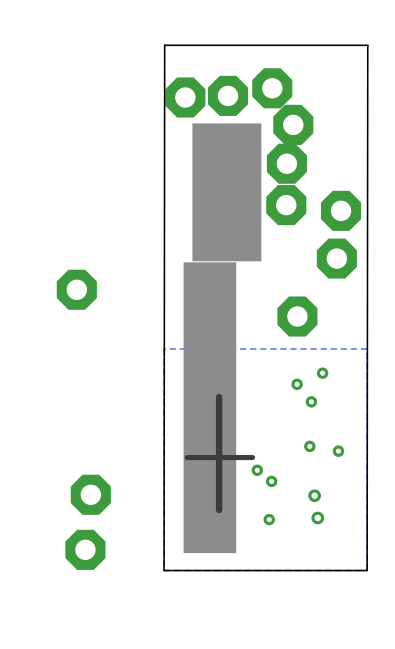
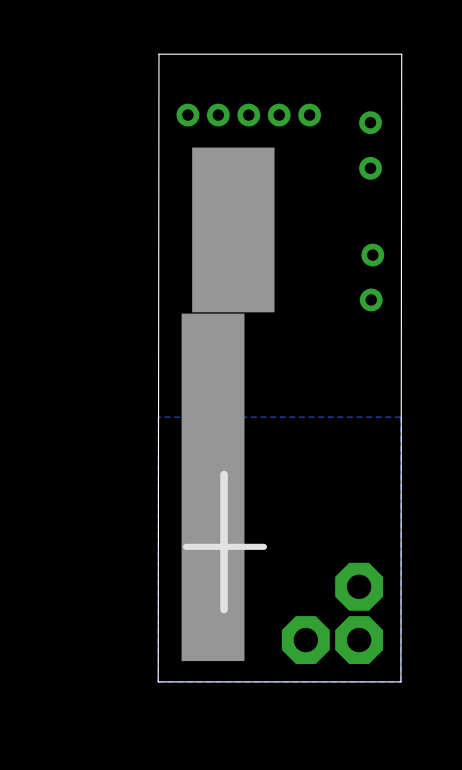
part footprint: [165, 77, 206, 118] -> [176, 103, 200, 127]
part: (272, 88) -> none
part: (228, 95) -> none
part: none -> (218, 115)
part: none -> (248, 115)
part: none -> (279, 115)
part: none -> (309, 115)
part: none -> (370, 122)
part: (293, 124) -> none
part: none -> (370, 168)
part: (286, 163) -> none
part footprint: [320, 190, 362, 231] -> [361, 243, 385, 267]
part: (286, 205) -> none
part footprint: [316, 238, 357, 279] -> [359, 288, 383, 312]
part: (76, 289) -> none
part: (297, 316) -> none
via: (322, 373) -> none
via: (297, 384) -> none
via: (311, 401) -> none
via: (309, 446) -> none
via: (338, 451) -> none
via: (257, 470) -> none
via: (271, 481) -> none
part: none -> (359, 586)
part: (90, 494) -> none
via: (314, 495) -> none
via: (317, 518) -> none
via: (269, 519) -> none
part: none -> (305, 640)
part: none -> (359, 640)
part: (85, 549) -> none

